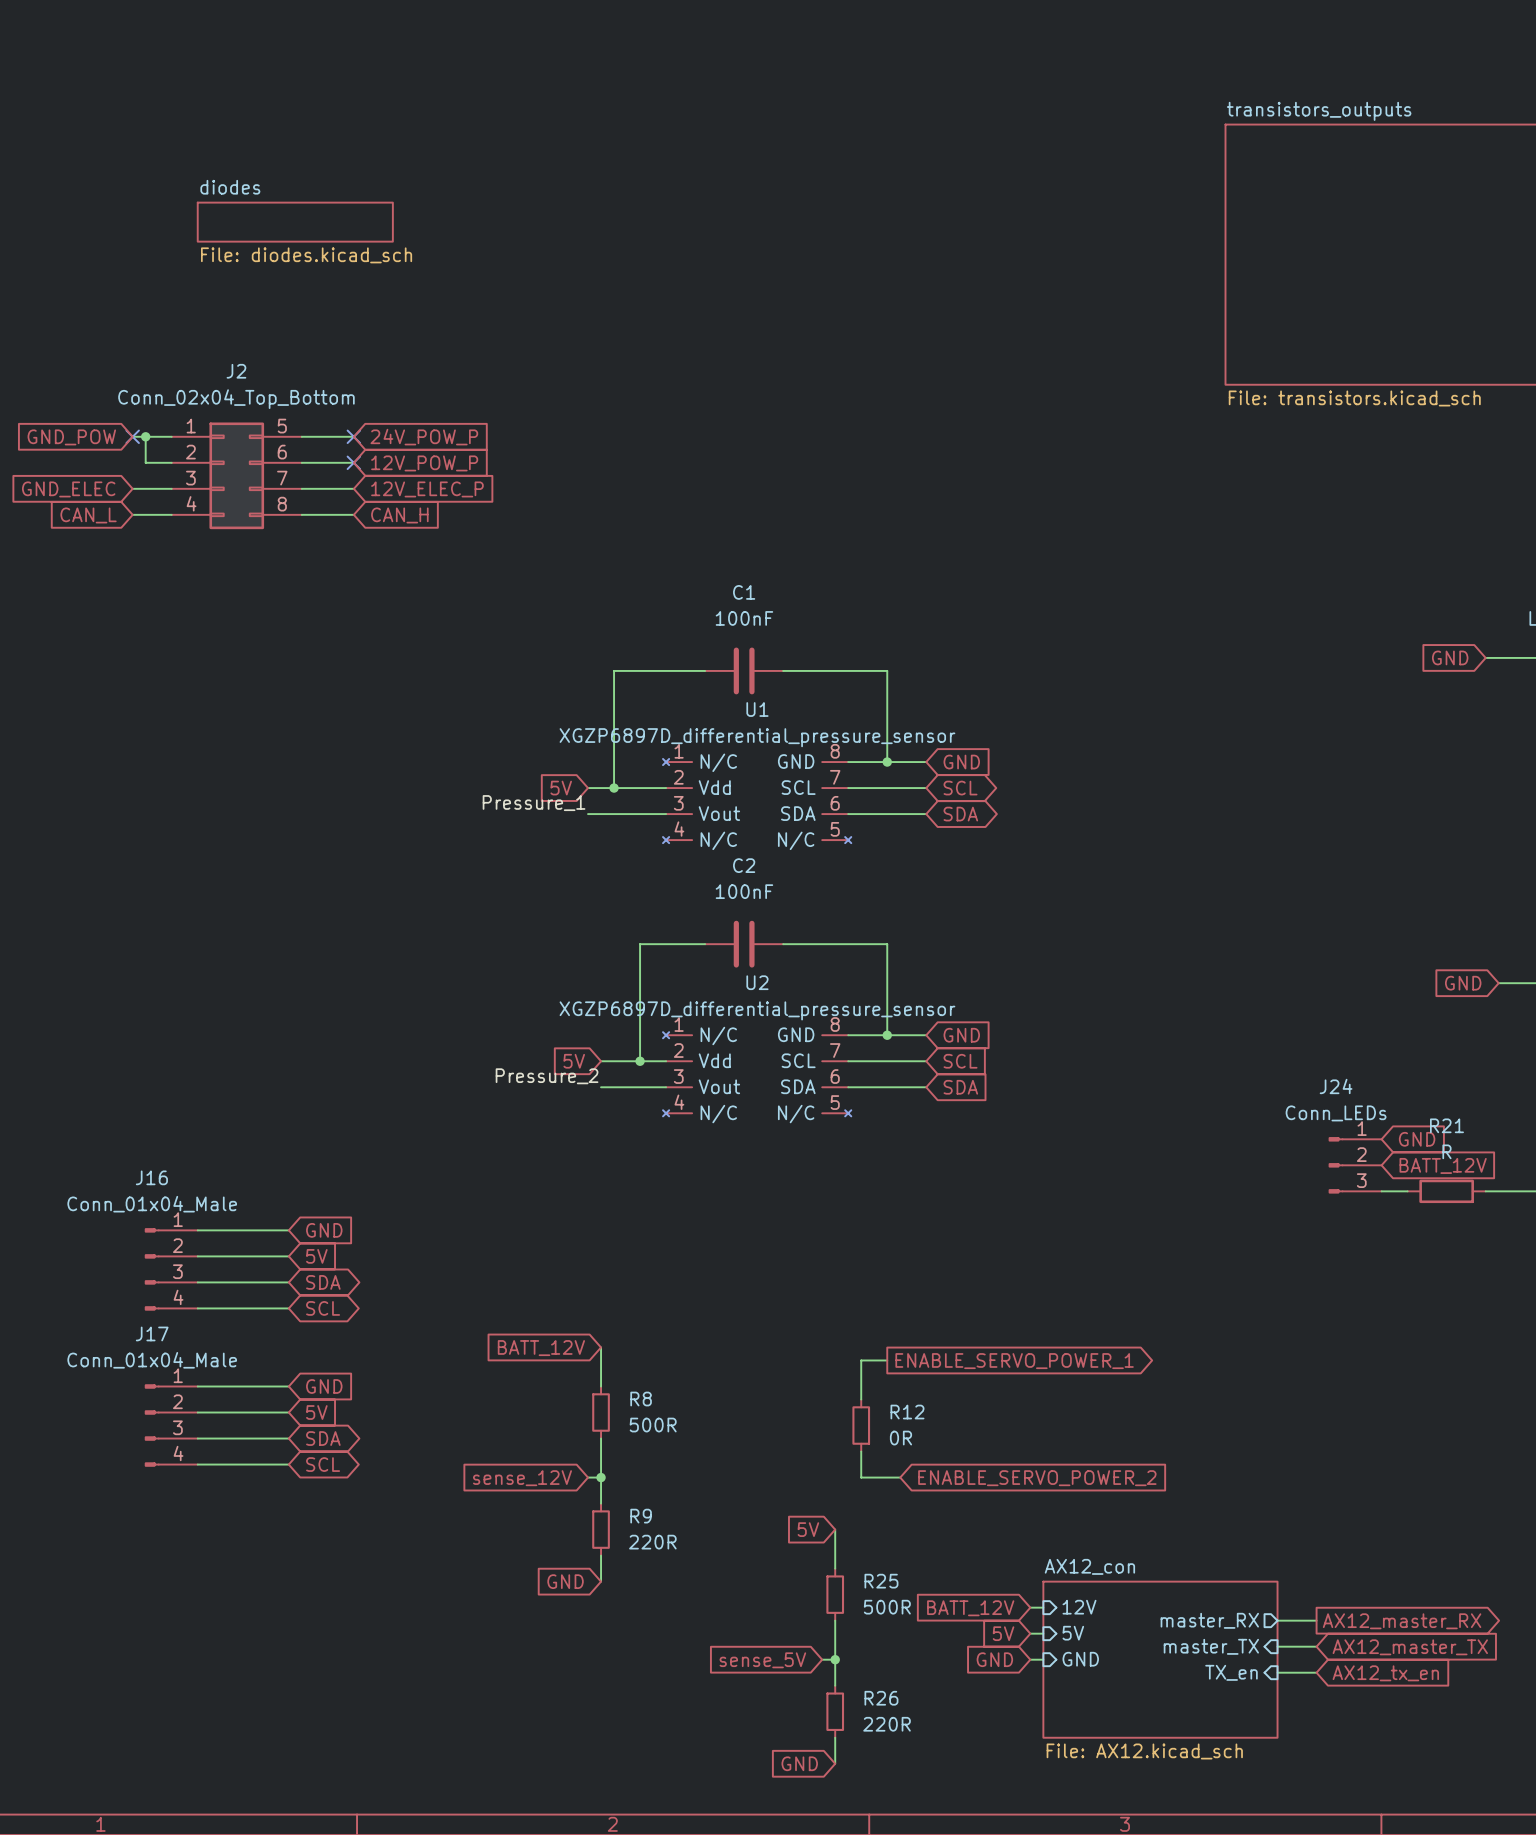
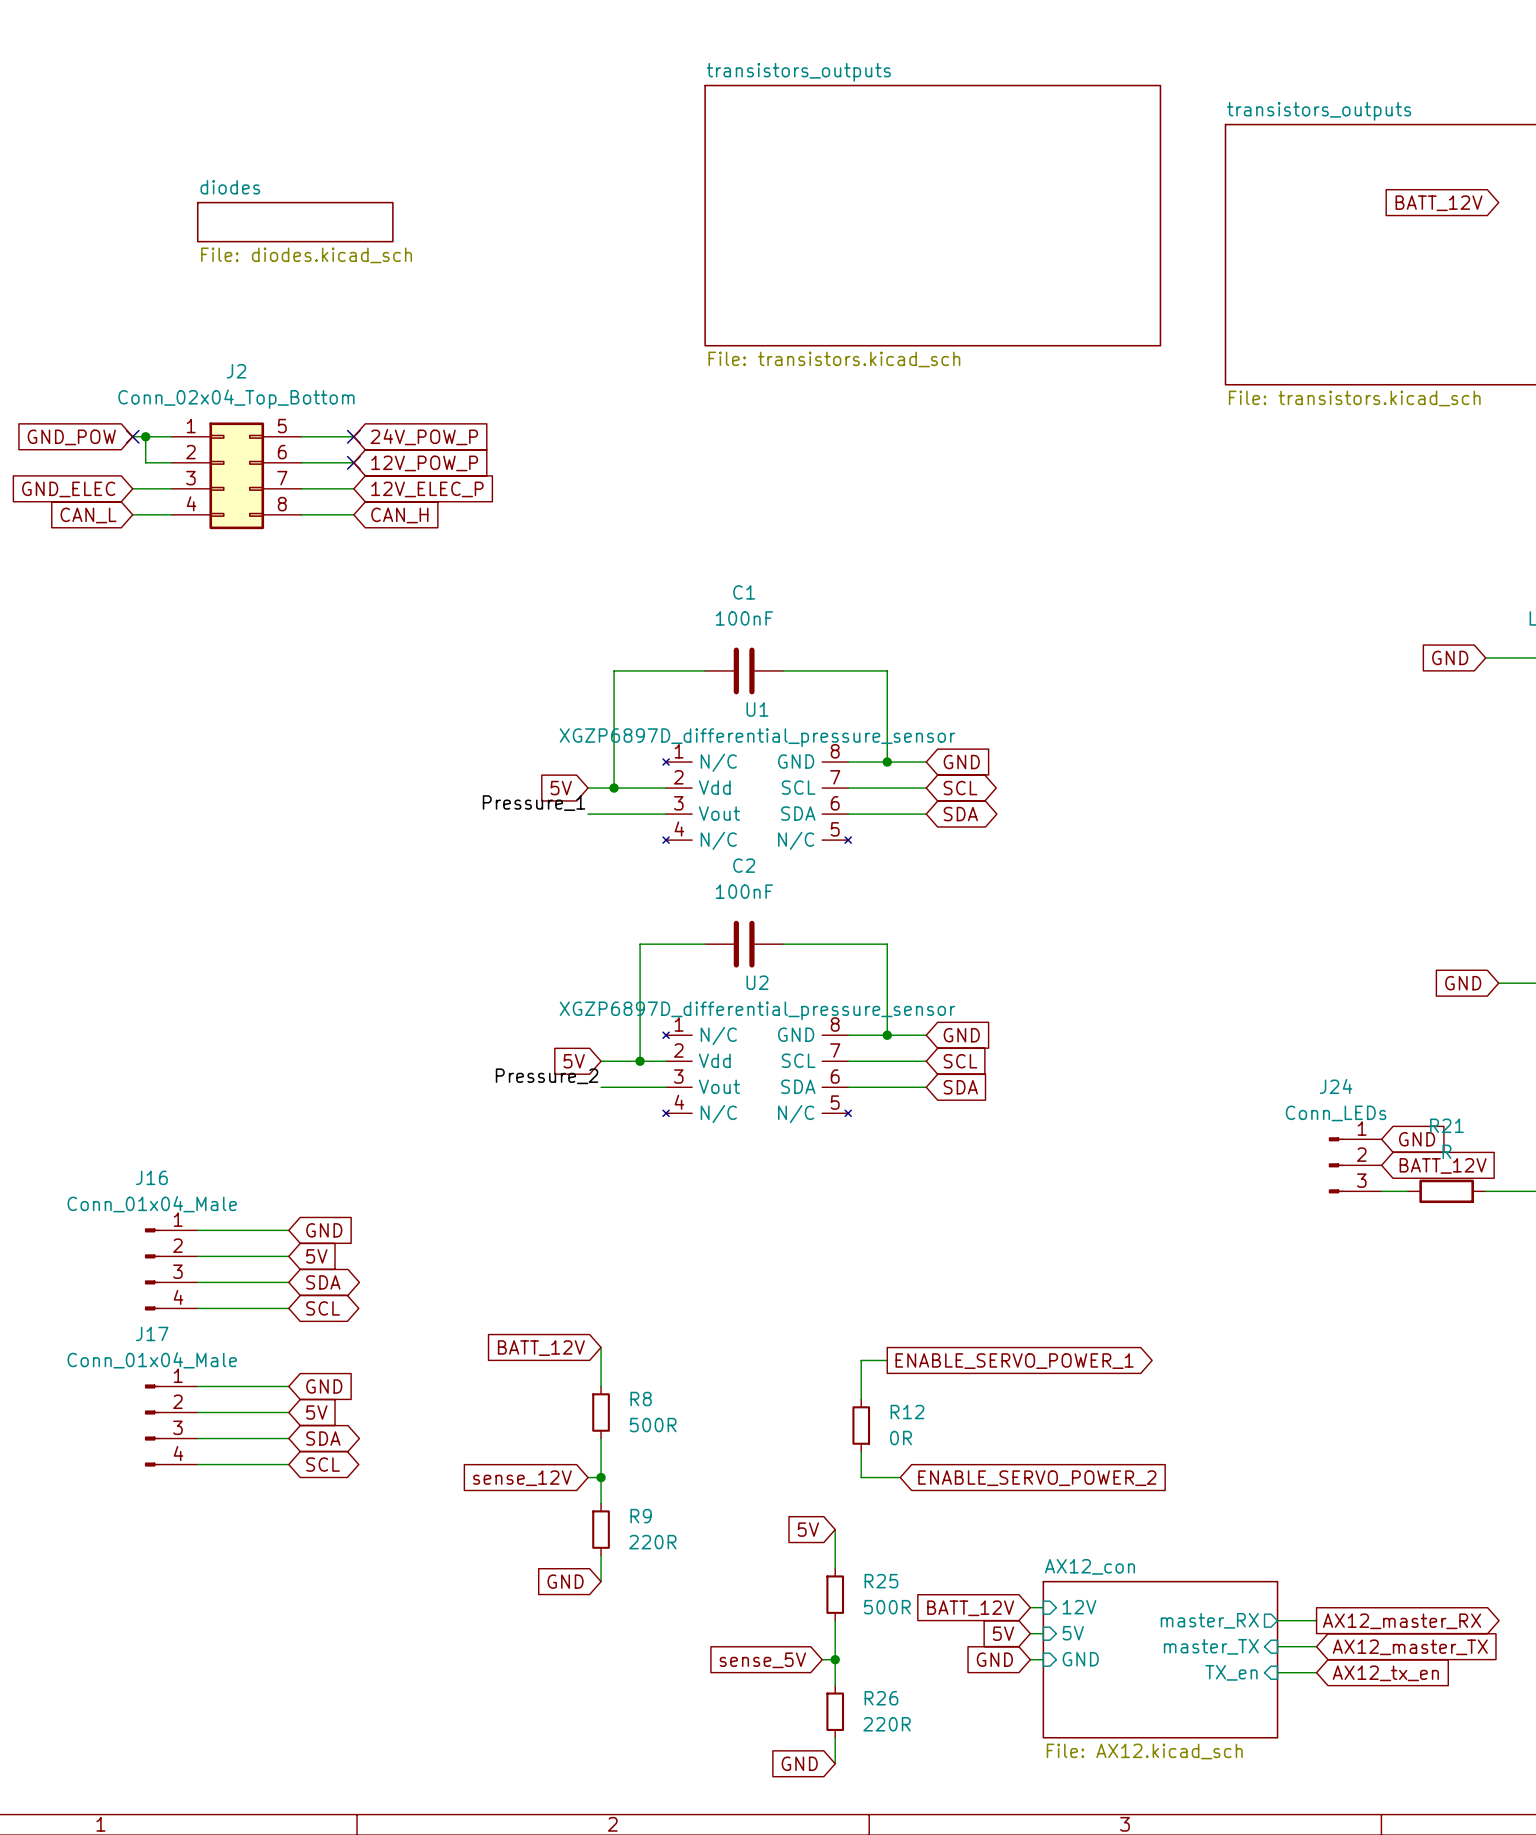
global label: none -> BATT_12V (1439, 203)
sheet transistors_outputs: none -> File: transistors.kicad_sch (932, 215)

